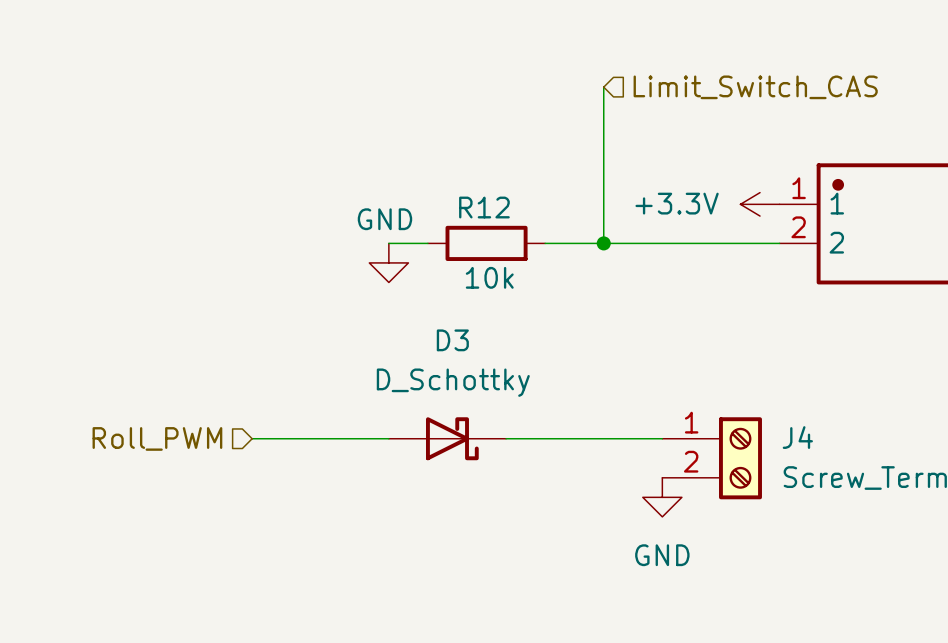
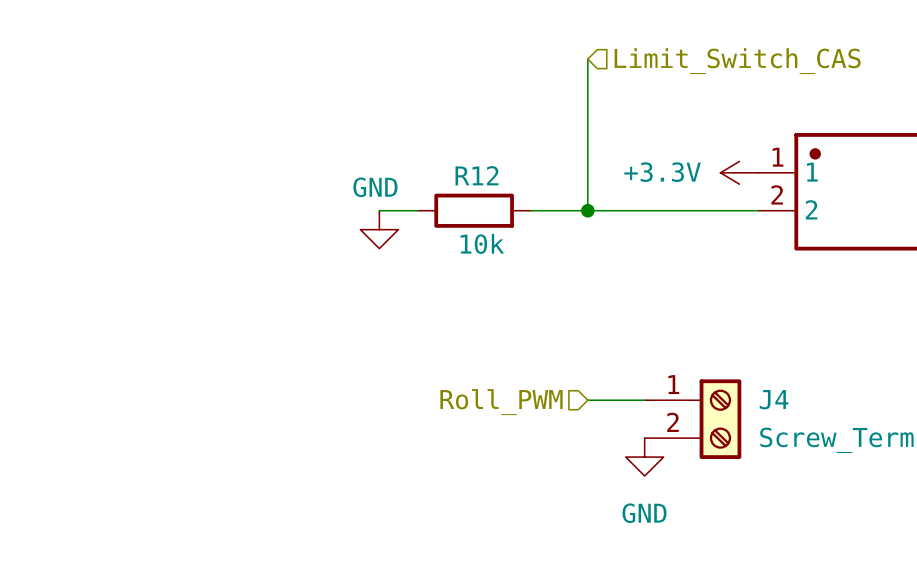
hierarchical label position: Roll_PWM (157, 438) -> Roll_PWM (501, 402)
wire: (252, 438) (388, 438) -> none
D3: D_Schottky (447, 438) -> none
wire: (506, 438) (603, 438) -> none

